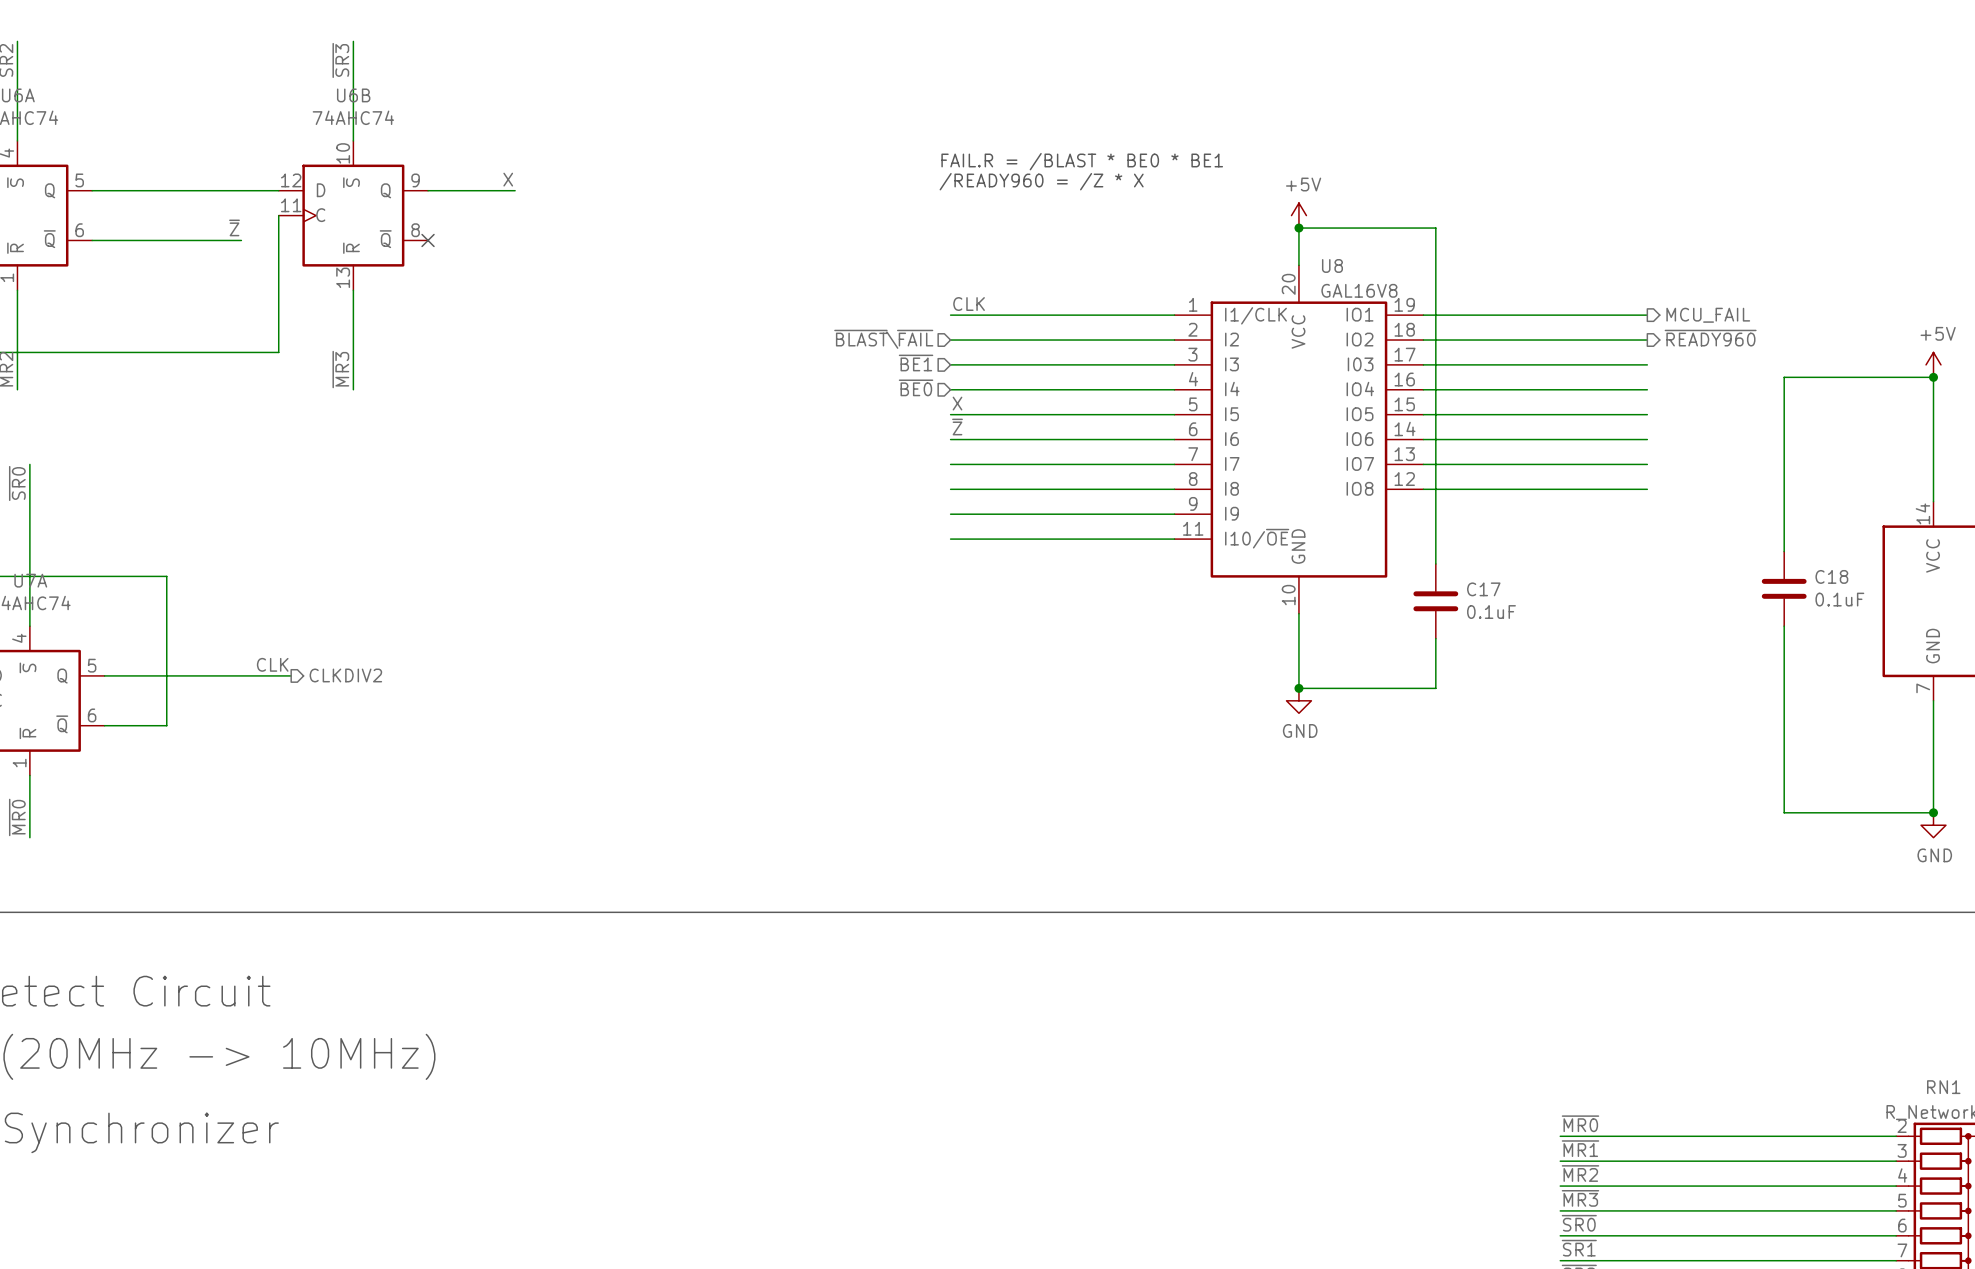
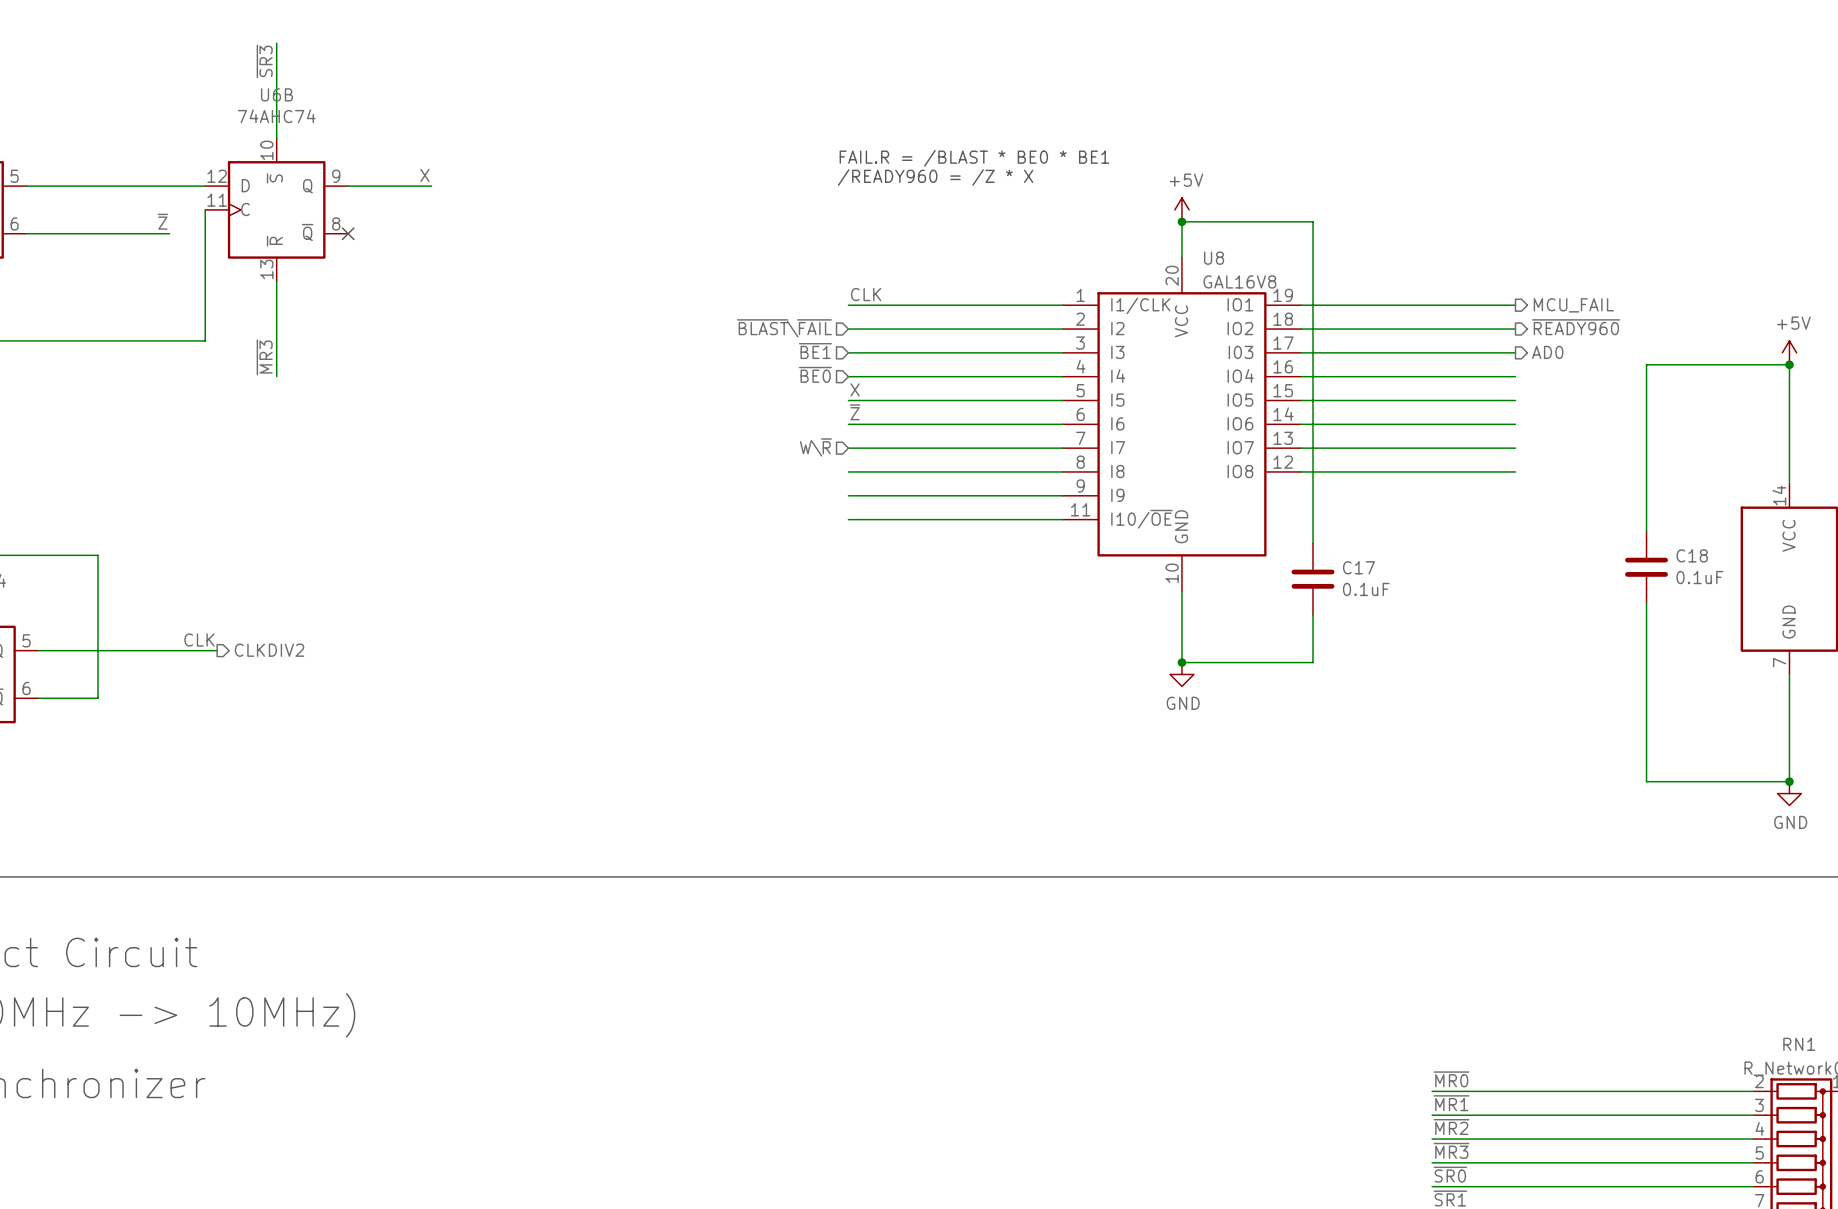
hierarchical label: none -> AD0 (1547, 352)
hierarchical label: none -> W\~{R} (815, 447)

